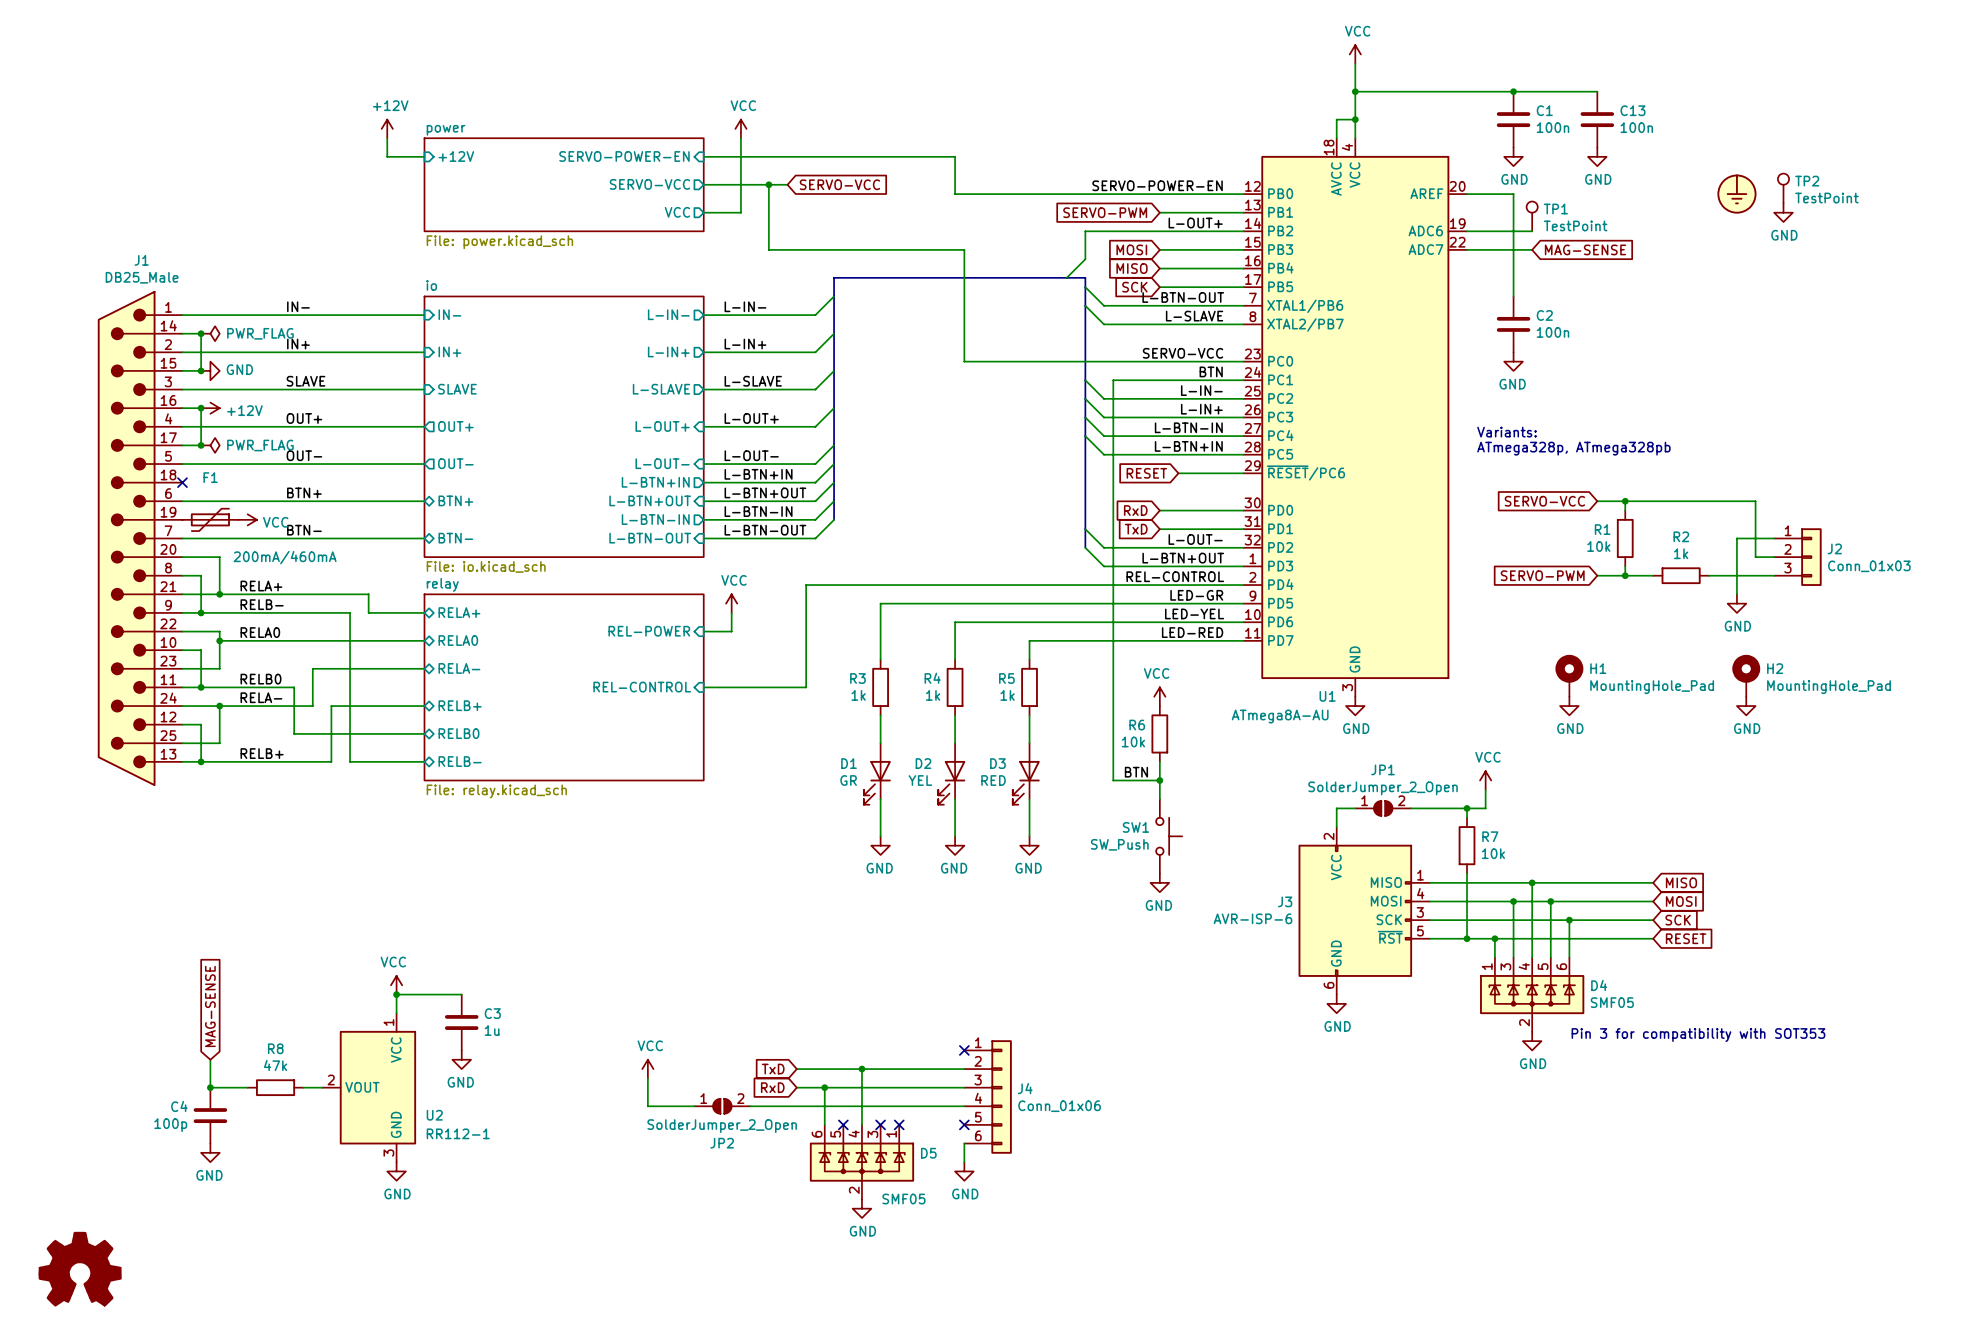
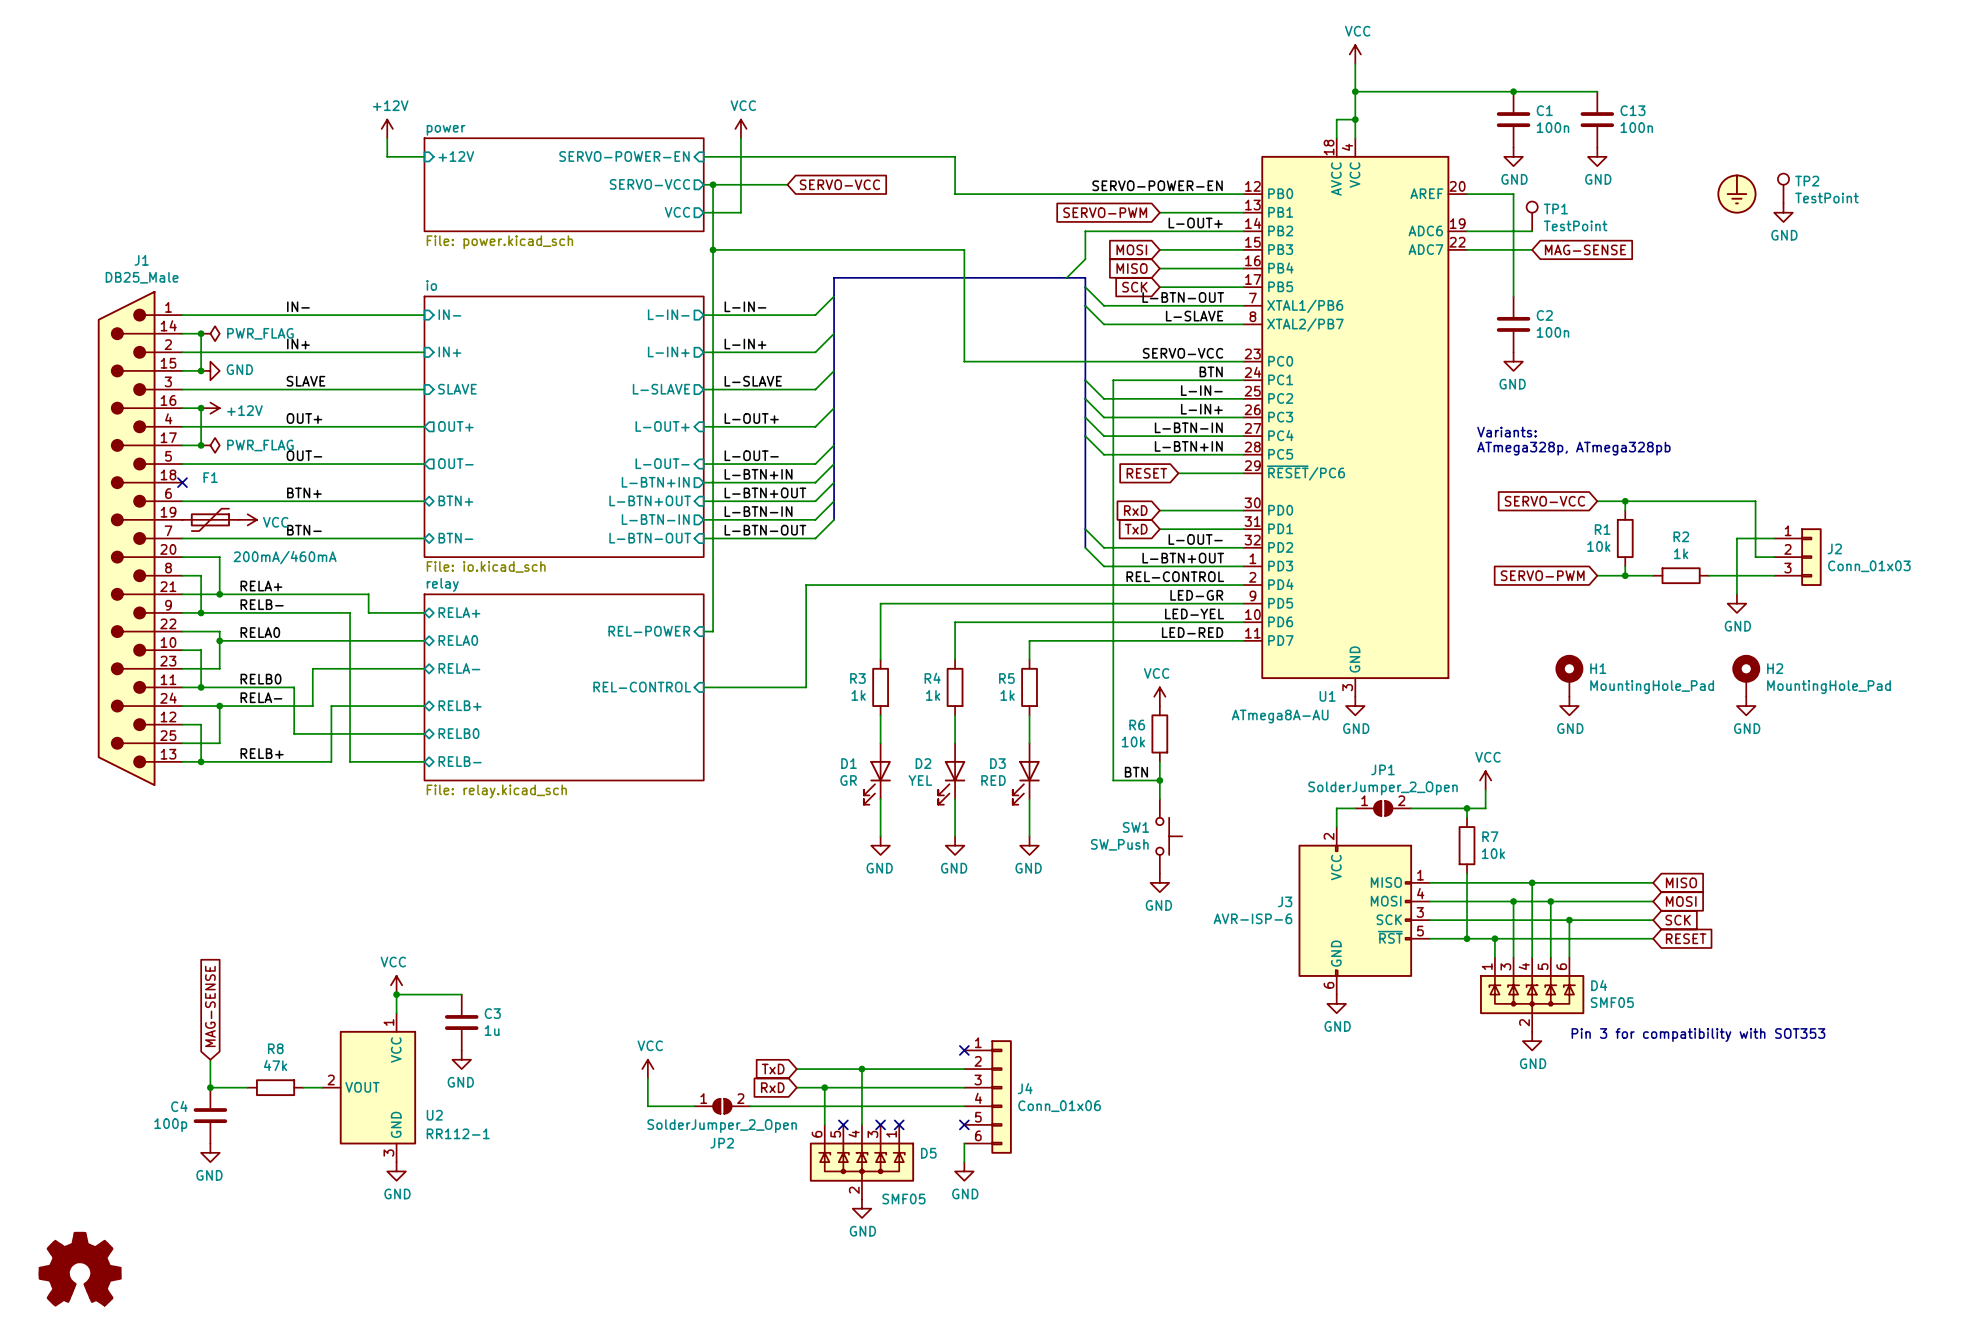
junction: none -> (713, 184)
wire: (768, 184) (768, 249) -> (713, 249) (768, 249)
junction: (768, 184) -> none
junction: none -> (713, 249)
power symbol: VCC (731, 603) -> none
wire: (731, 612) (731, 631) (713, 631) -> (713, 184) (713, 631)

